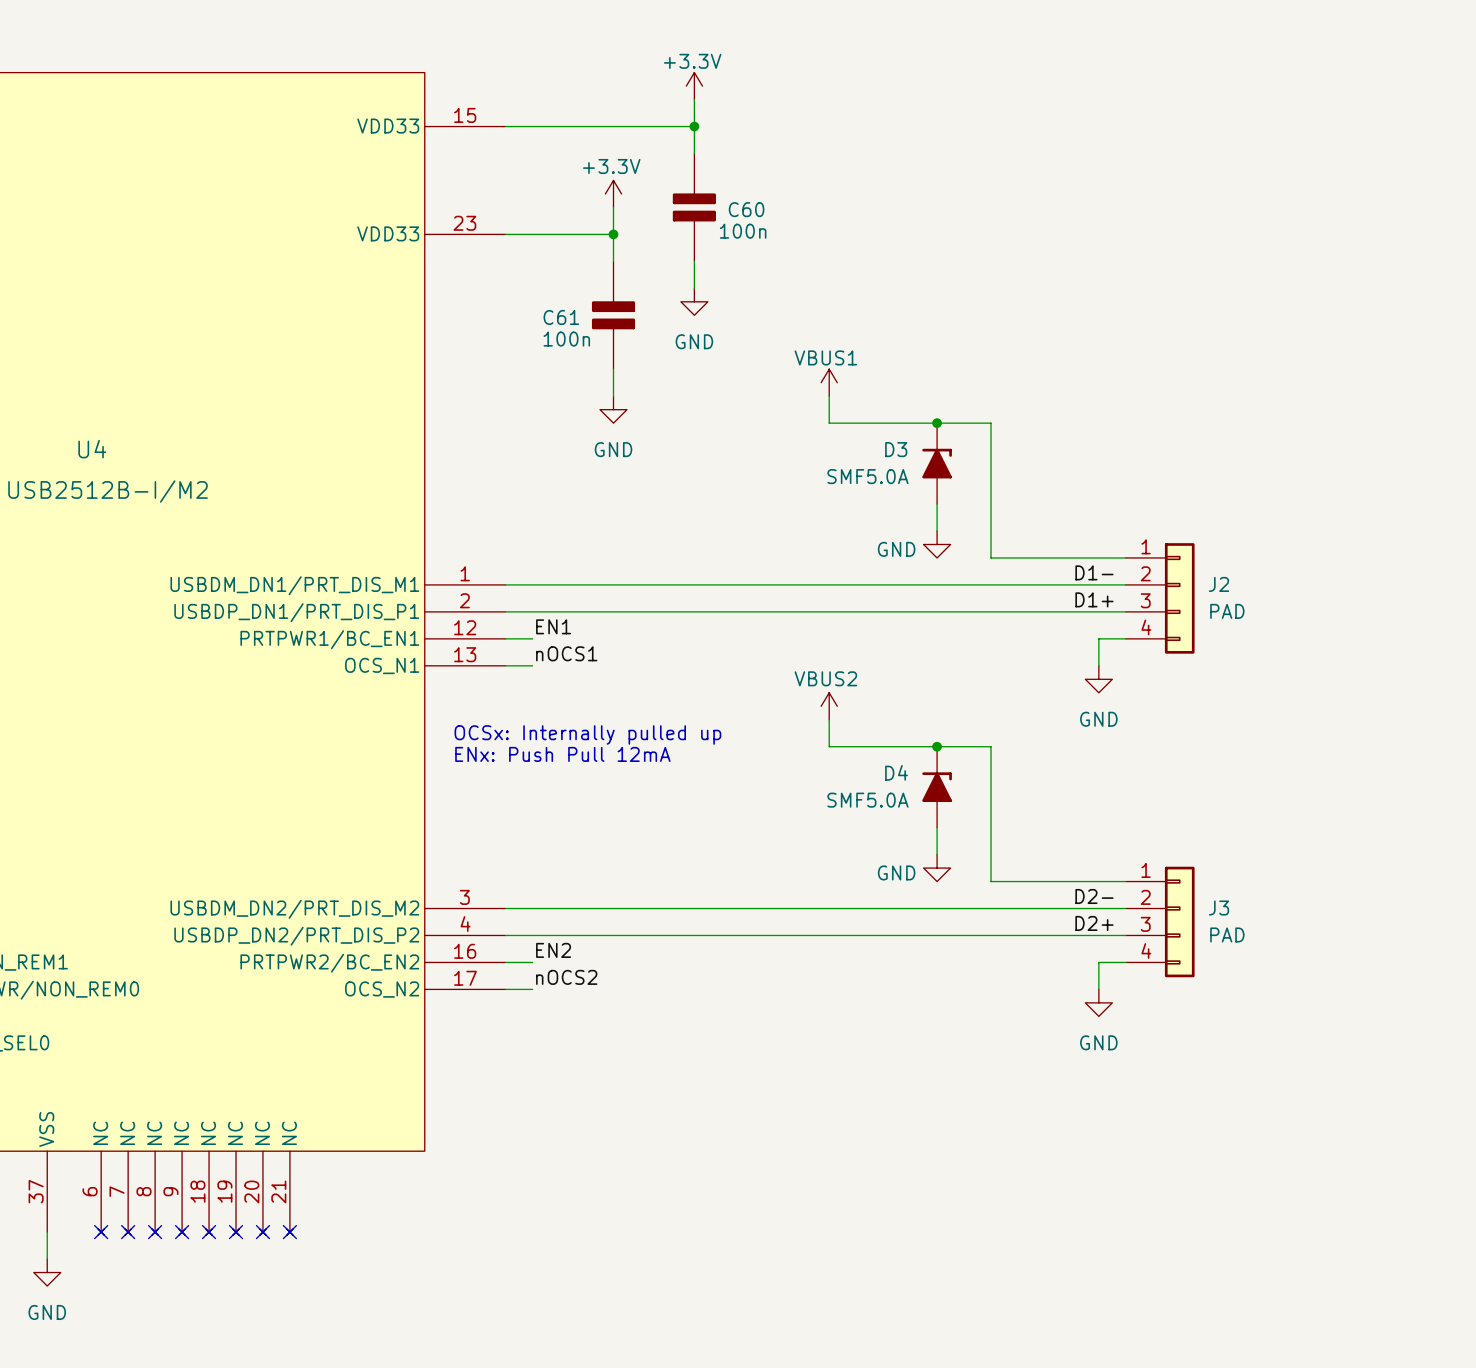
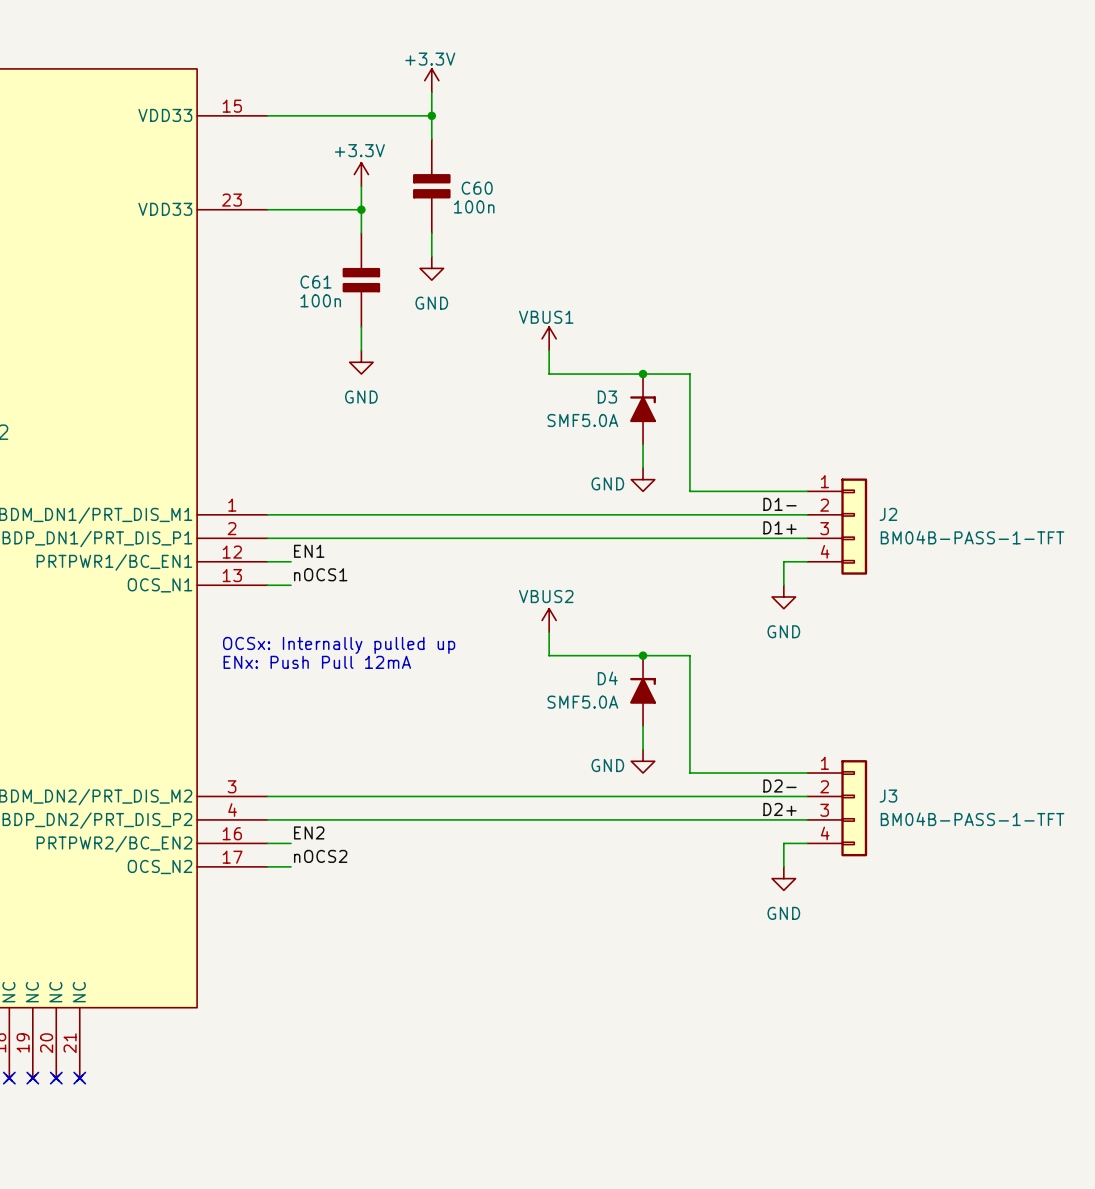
J2 value: PAD (1227, 611) -> BM04B-PASS-1-TFT (972, 537)
J3 value: PAD (1227, 934) -> BM04B-PASS-1-TFT (972, 819)

